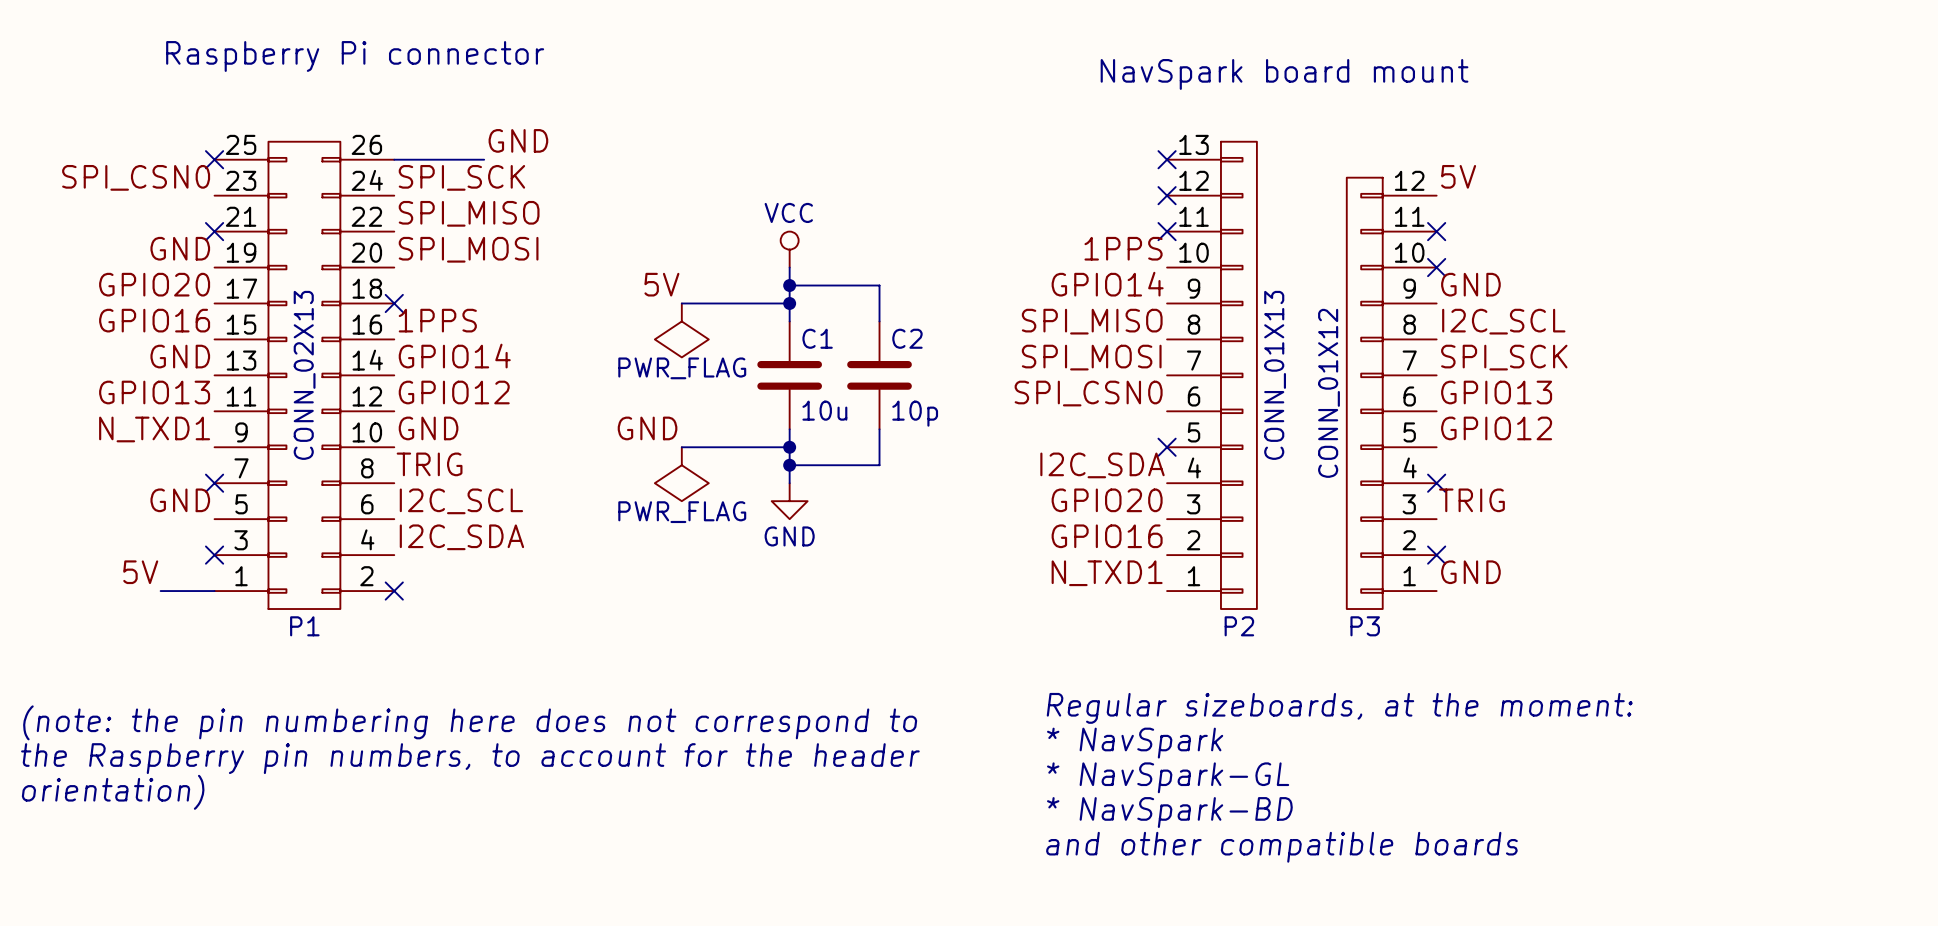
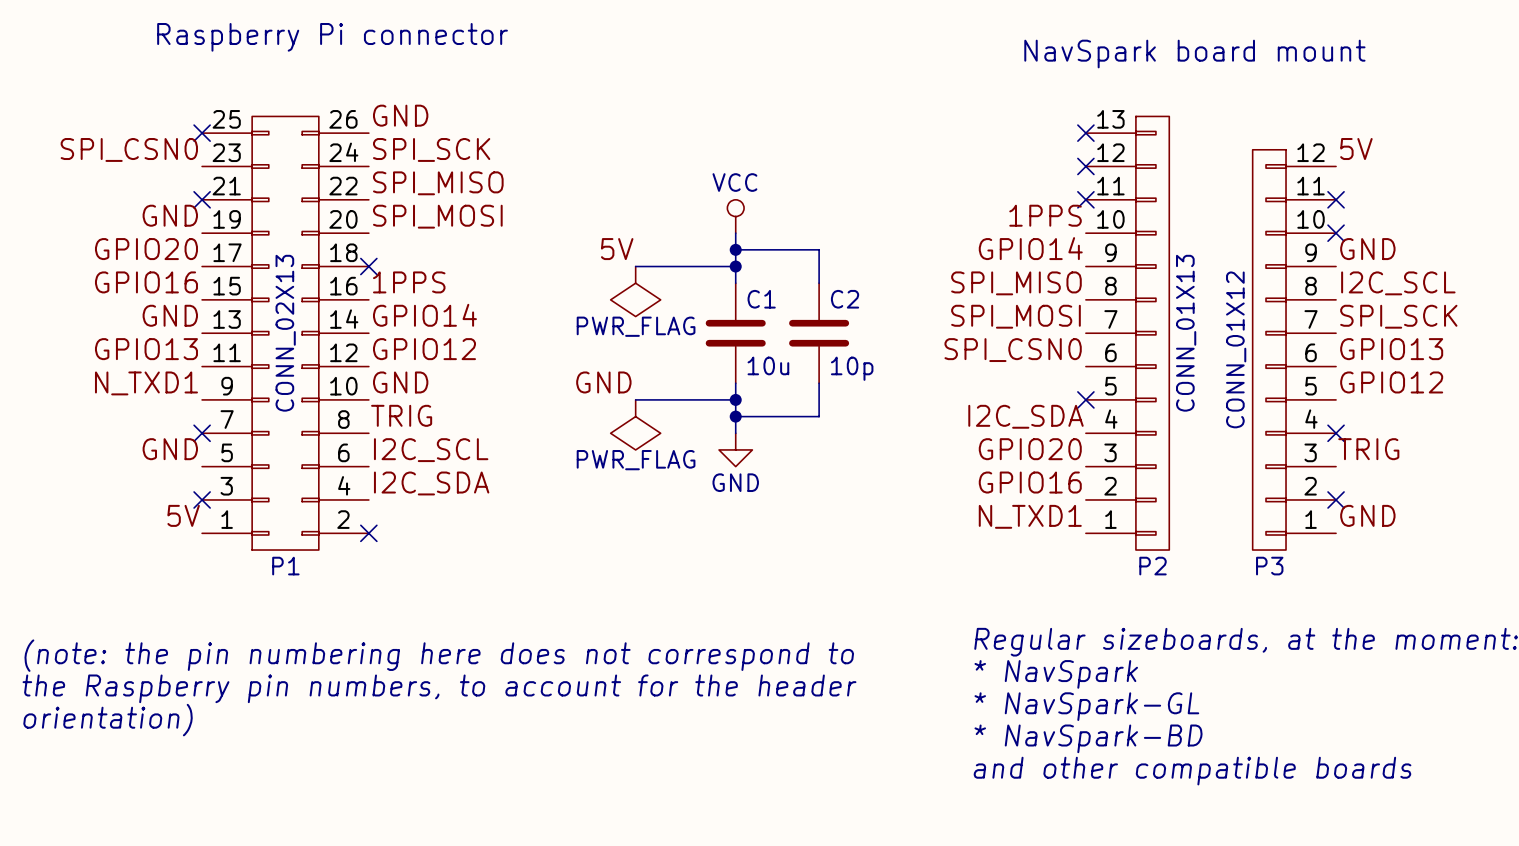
label position: GND (518, 140) -> GND (400, 115)
wire: (394, 159) (484, 159) -> none
label position: 5V (140, 572) -> 5V (183, 515)
wire: (160, 591) (214, 591) -> none

